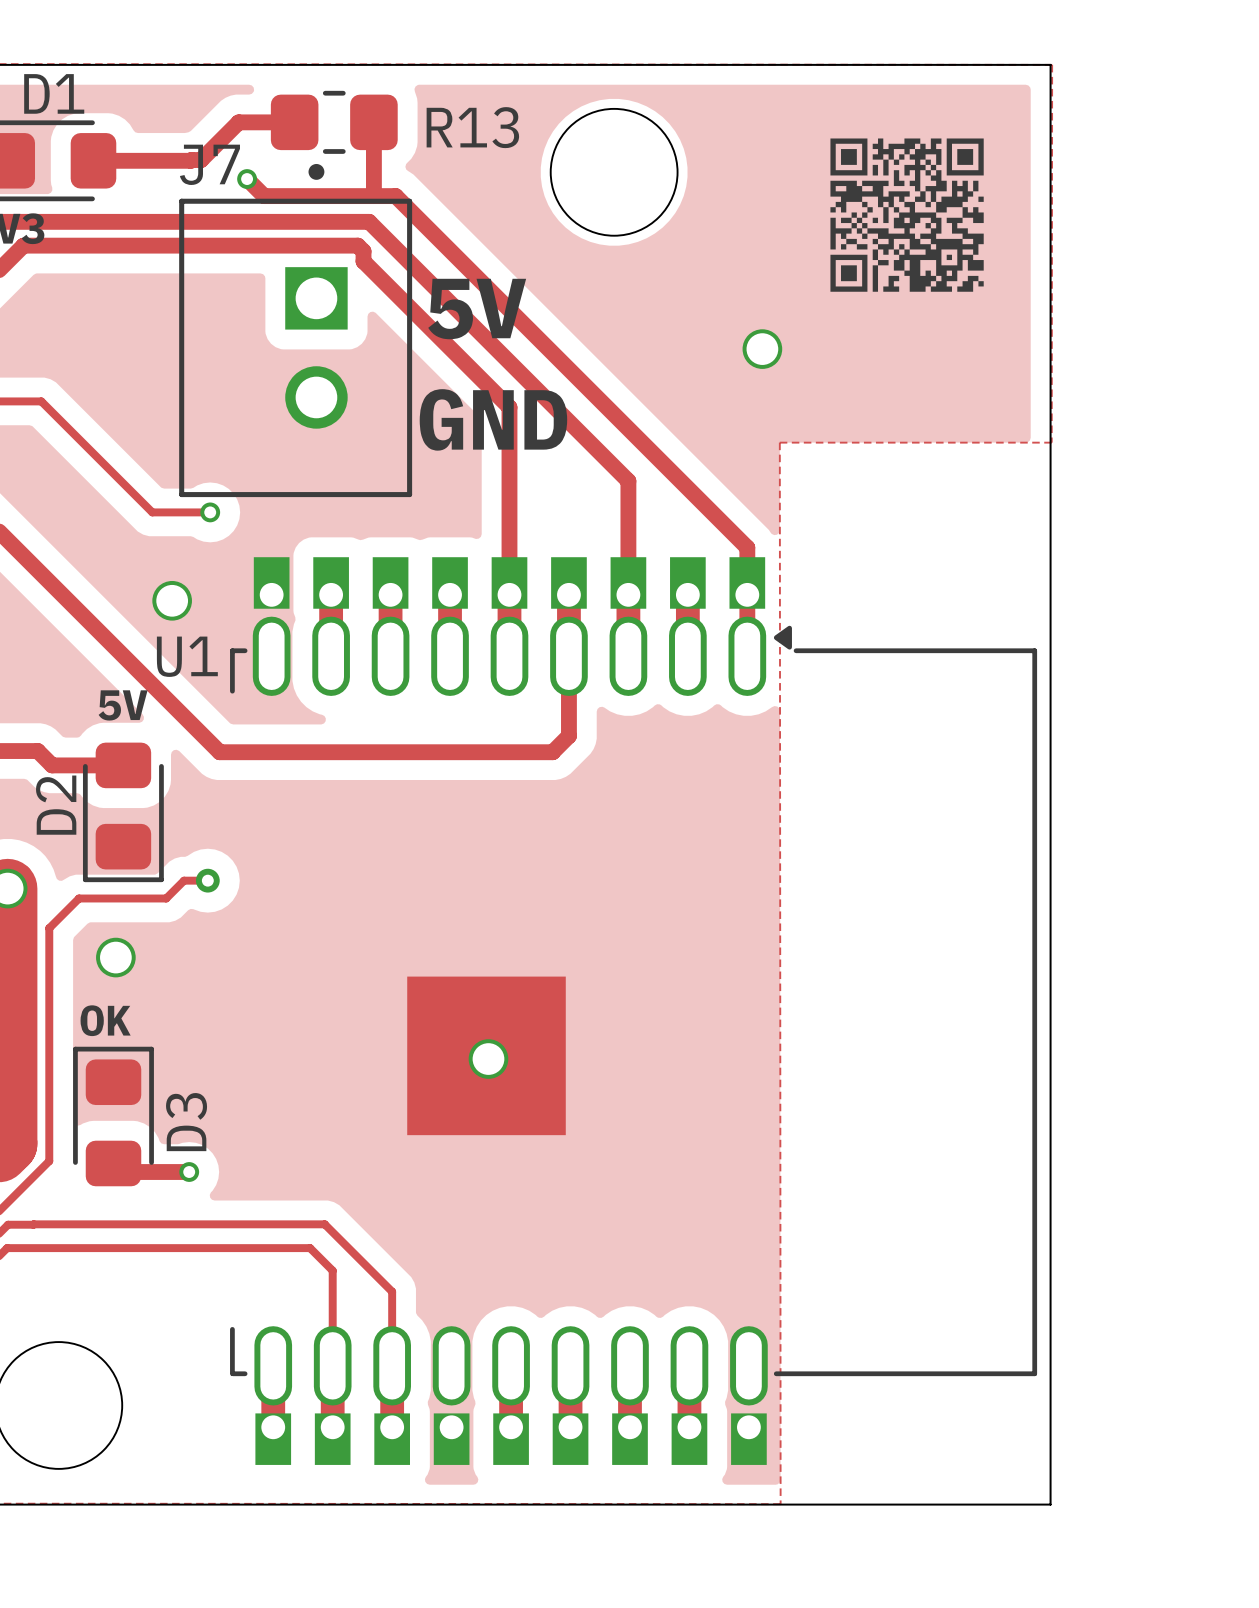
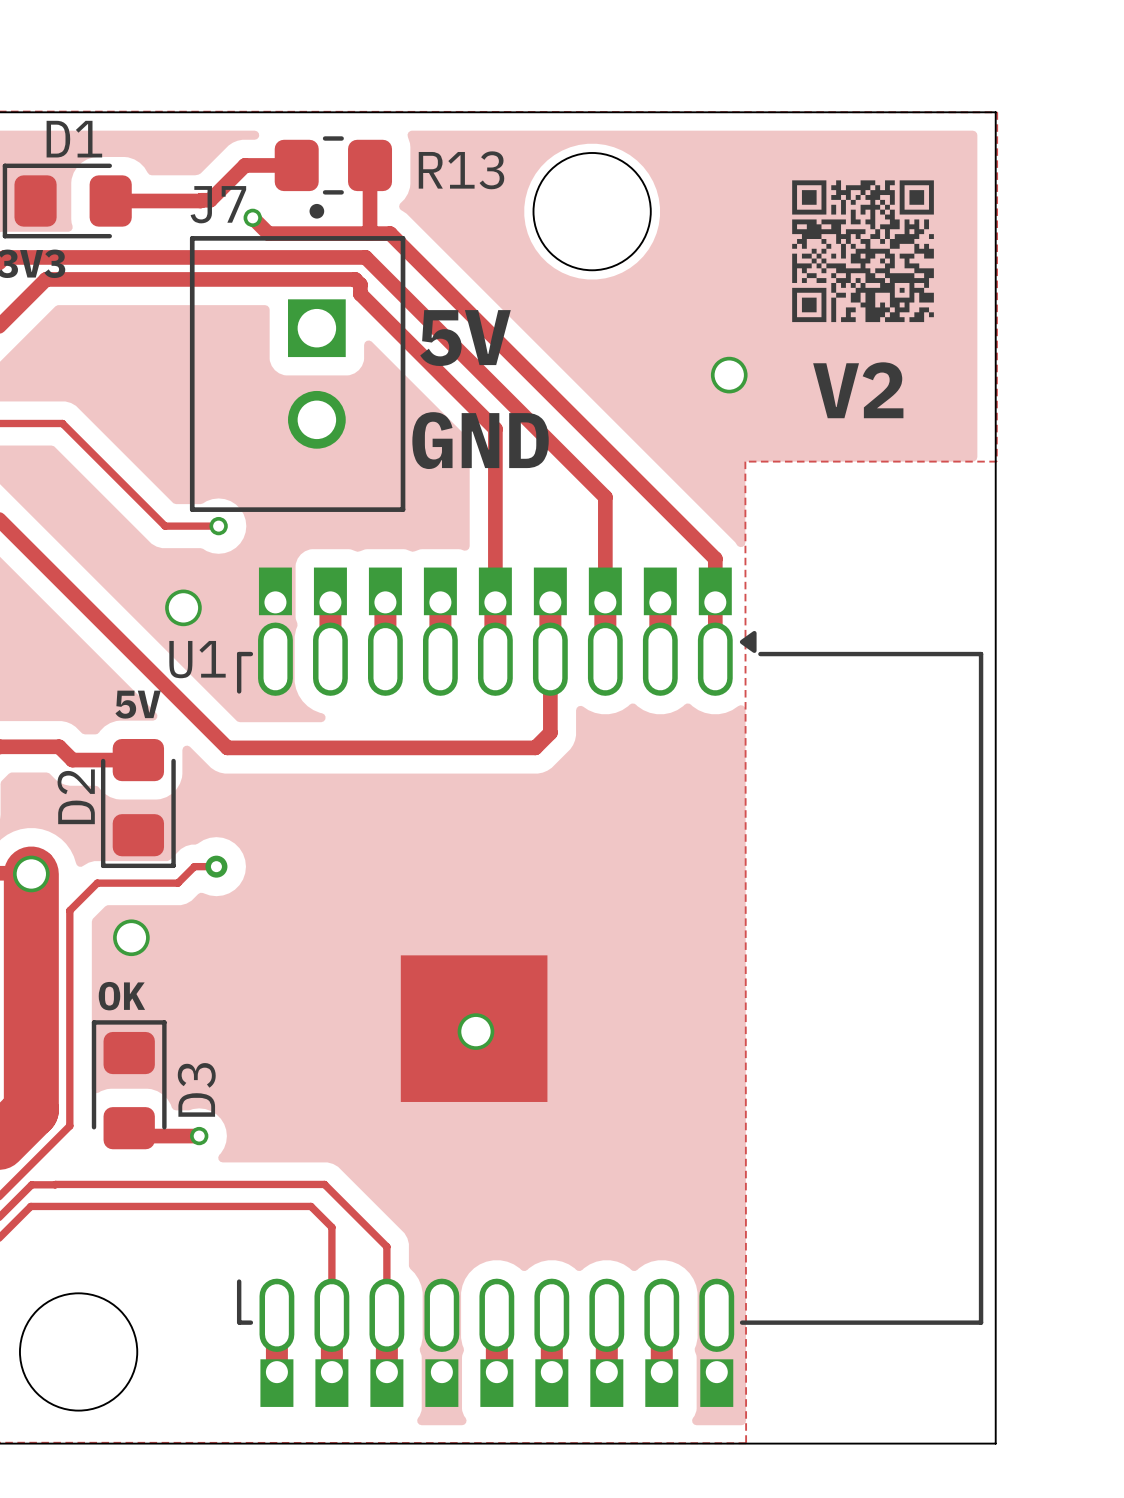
text: none -> V2 (858, 390)

